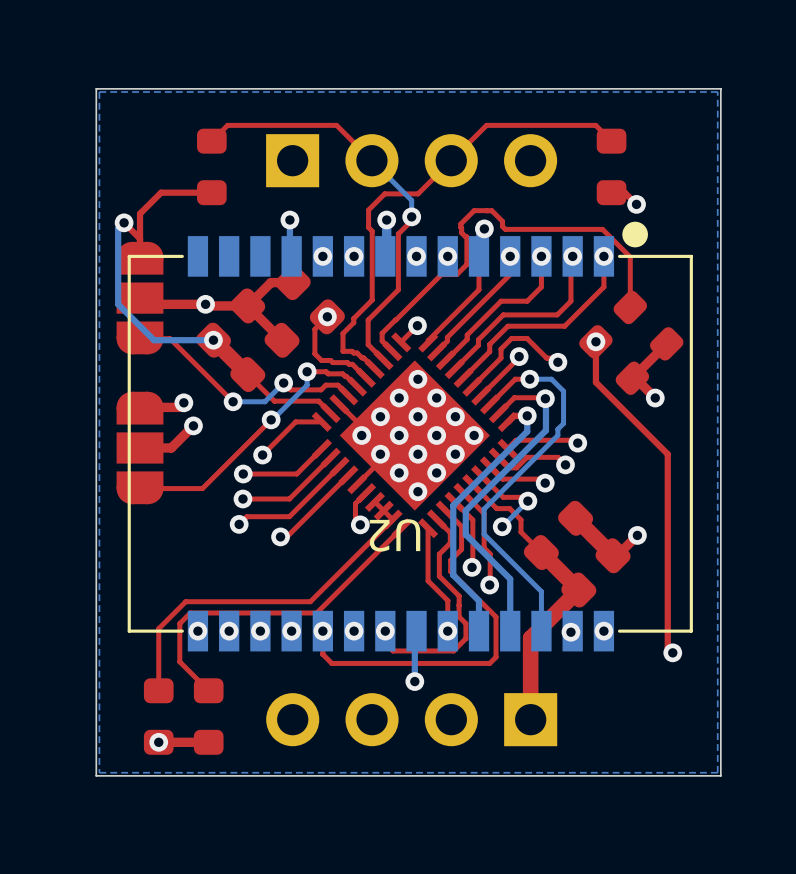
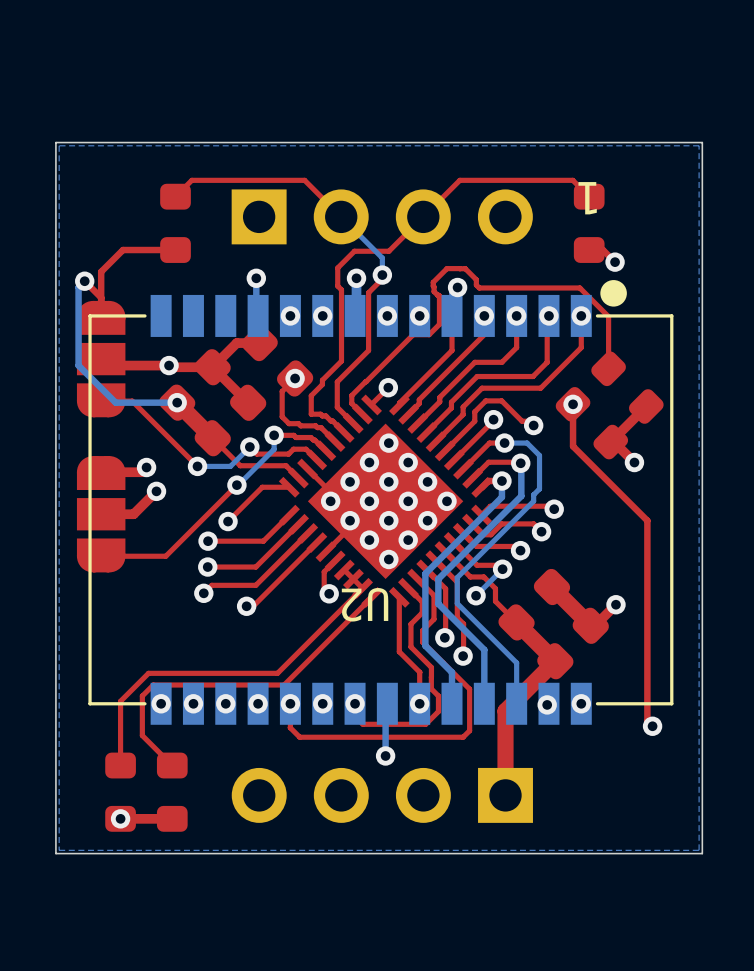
text: none -> 1 (587, 198)

